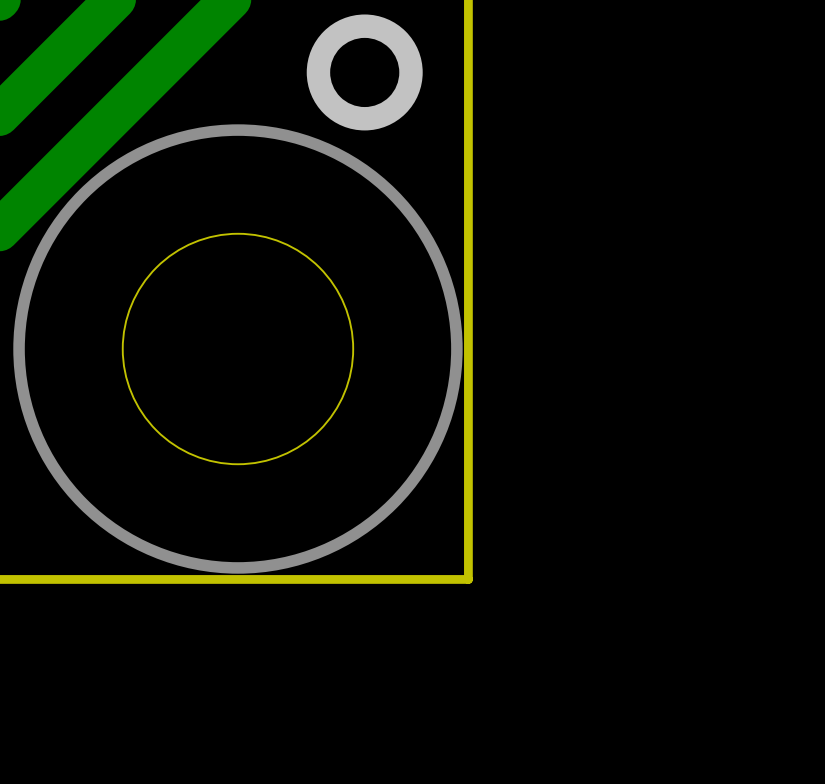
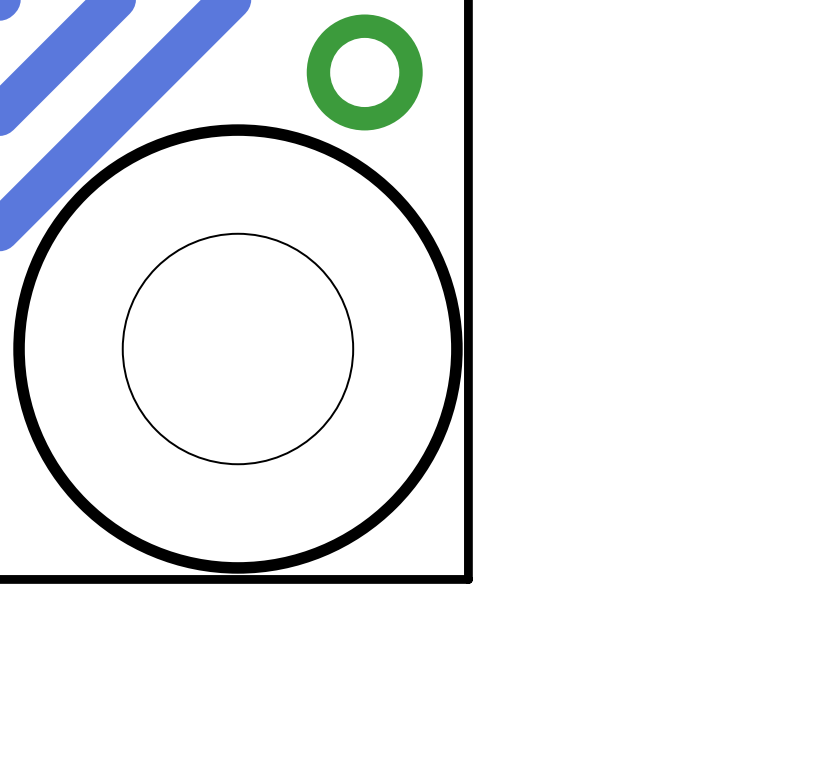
drawing: [13, 124, 463, 574] -> none
round board edge: none -> [13, 124, 463, 574]

